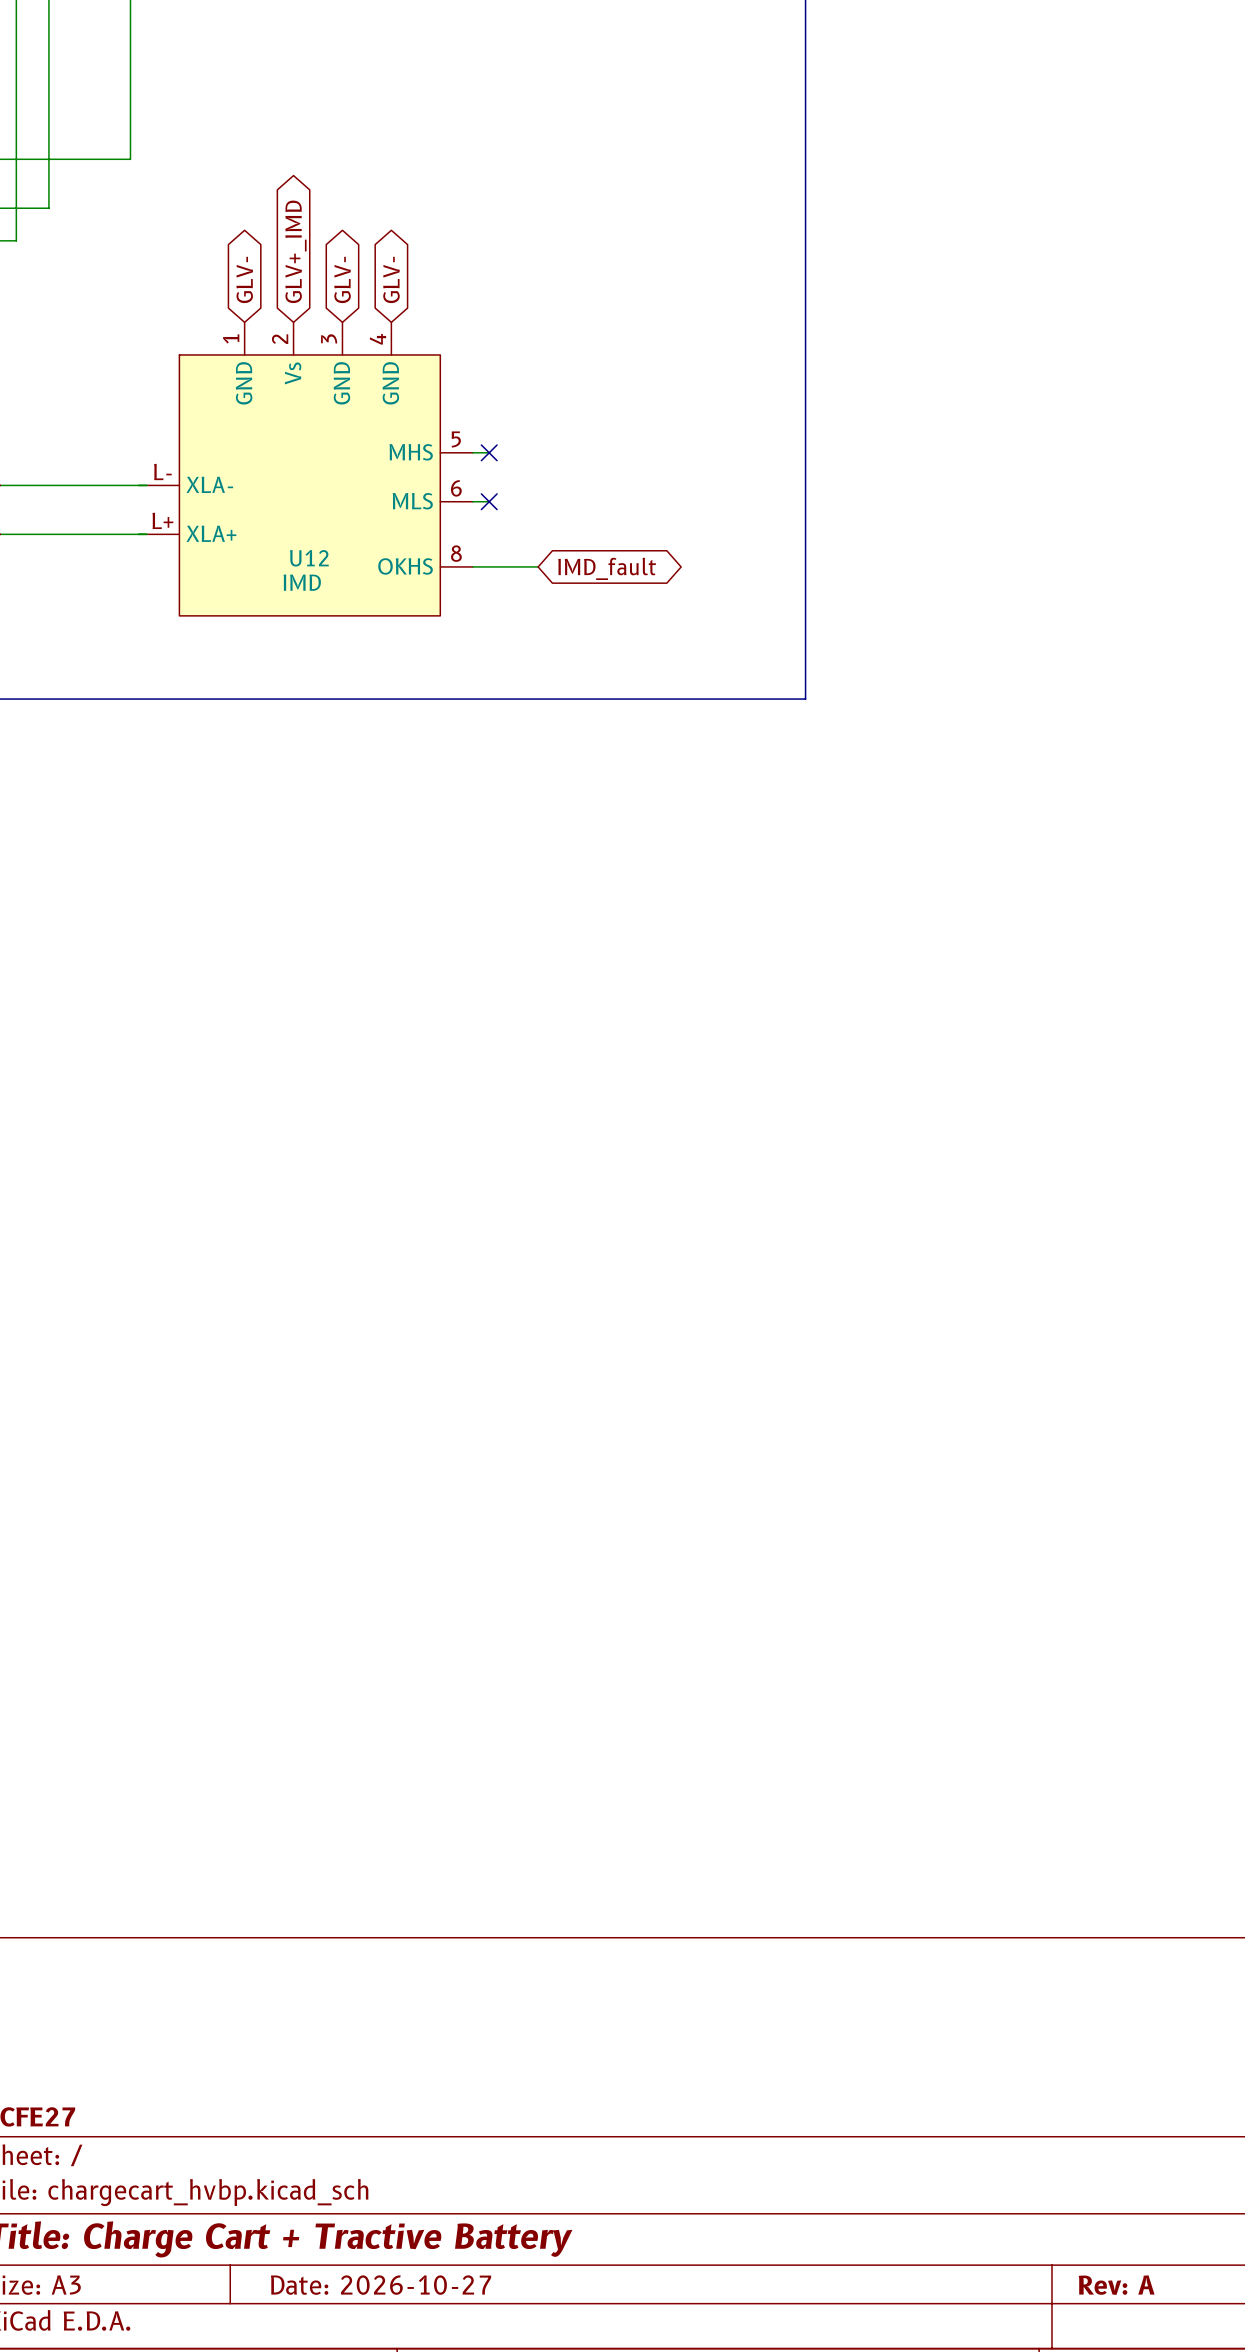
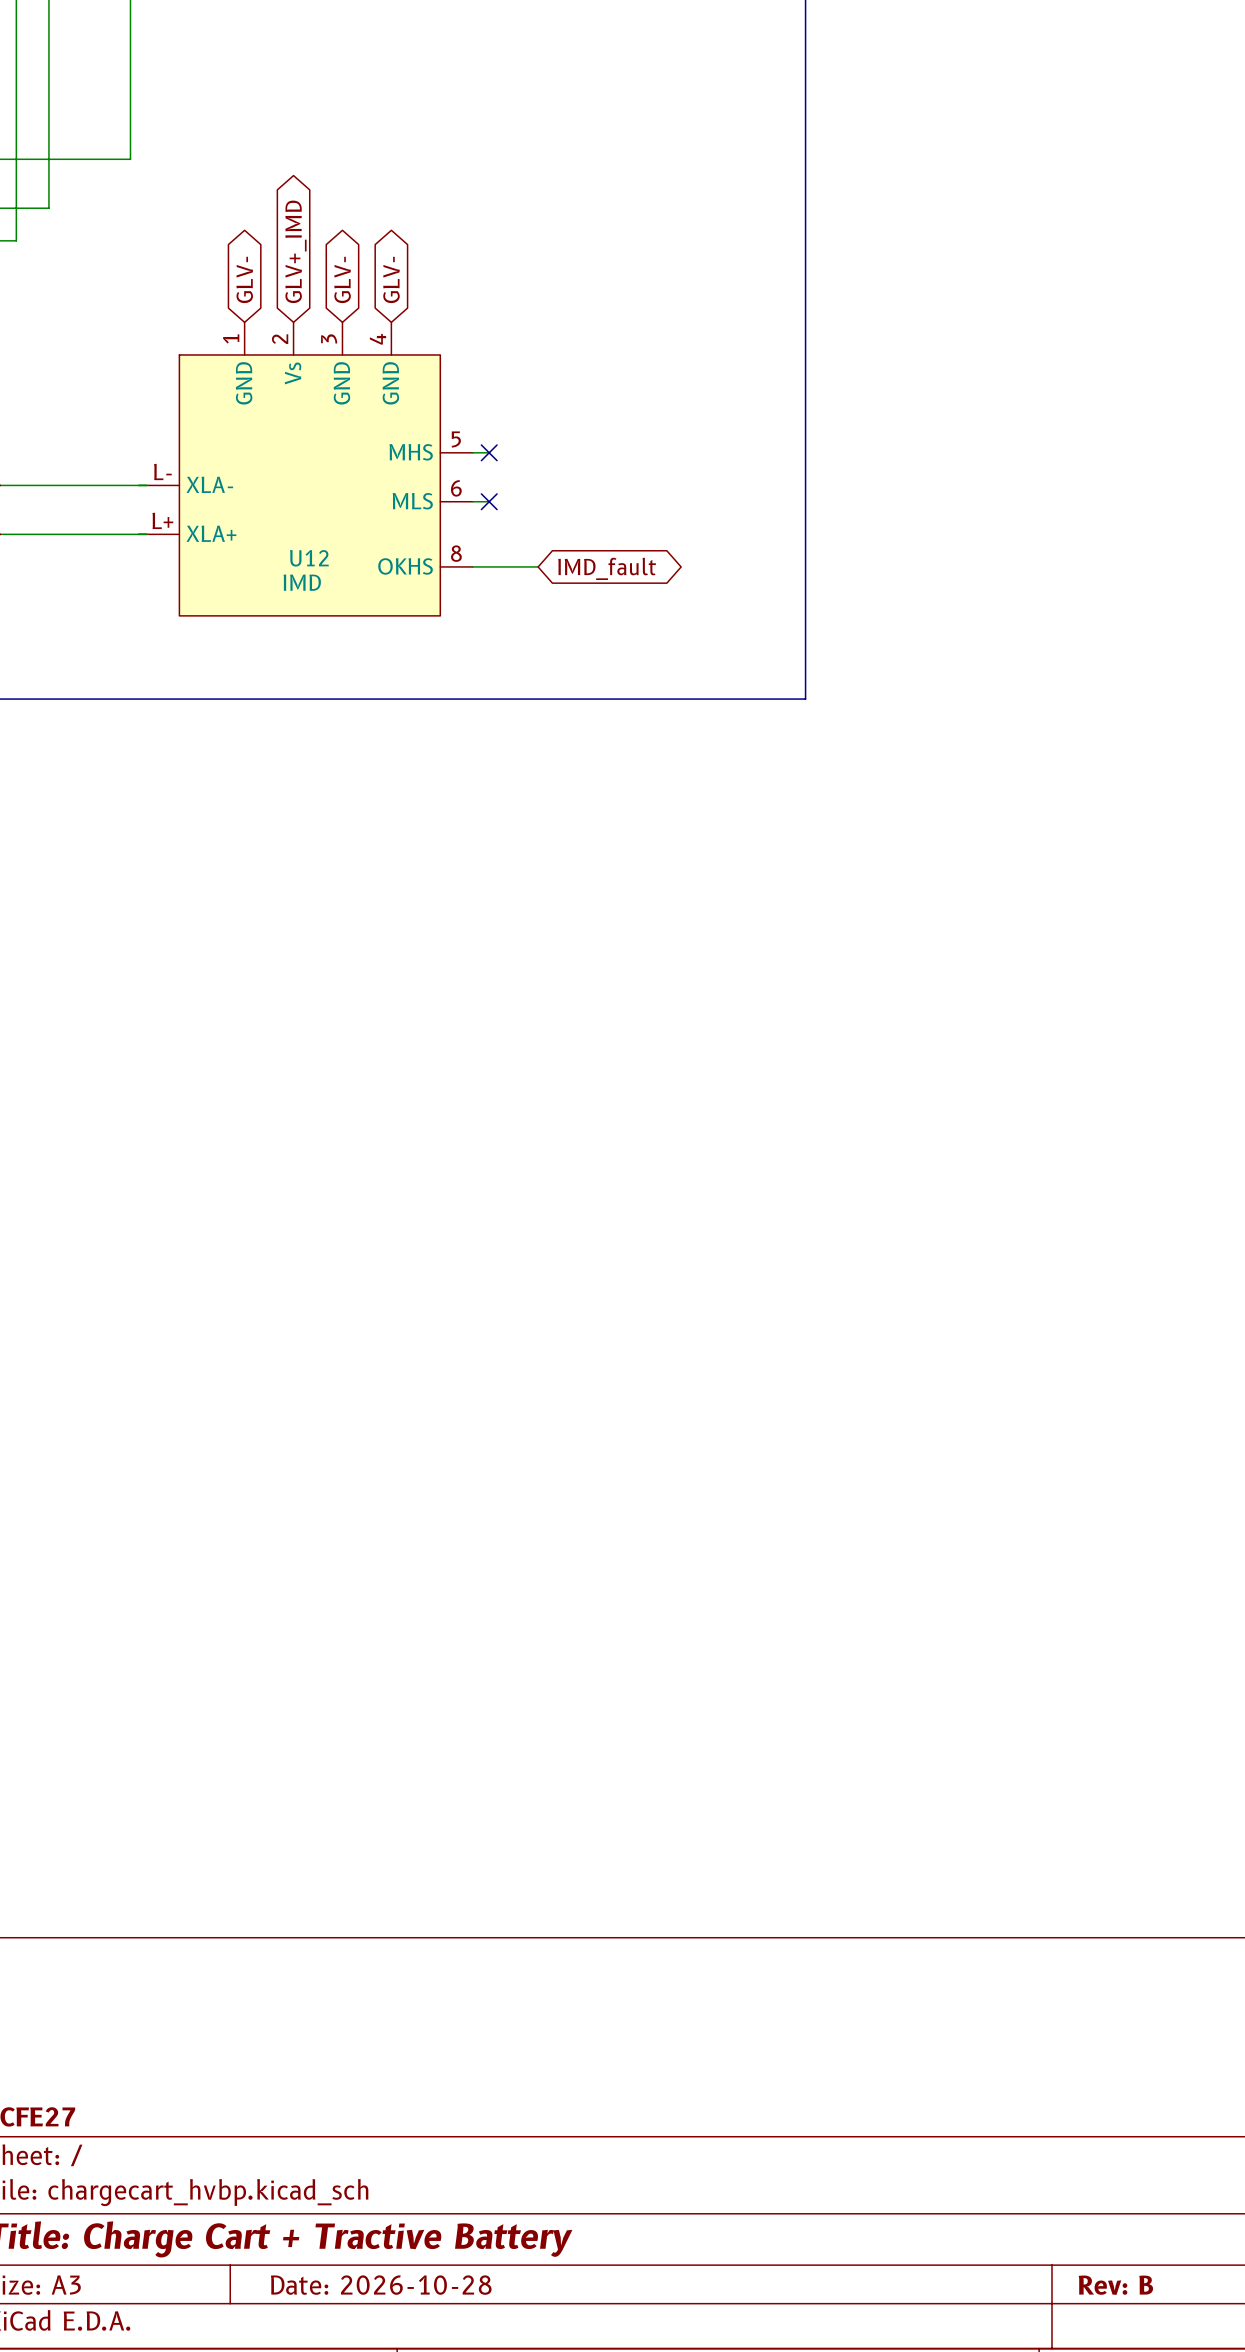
title block: Date: 2026-10-27 (381, 2285) -> Date: 2026-10-28 (381, 2285)
title block: Rev: A (1116, 2285) -> Rev: B (1115, 2285)

